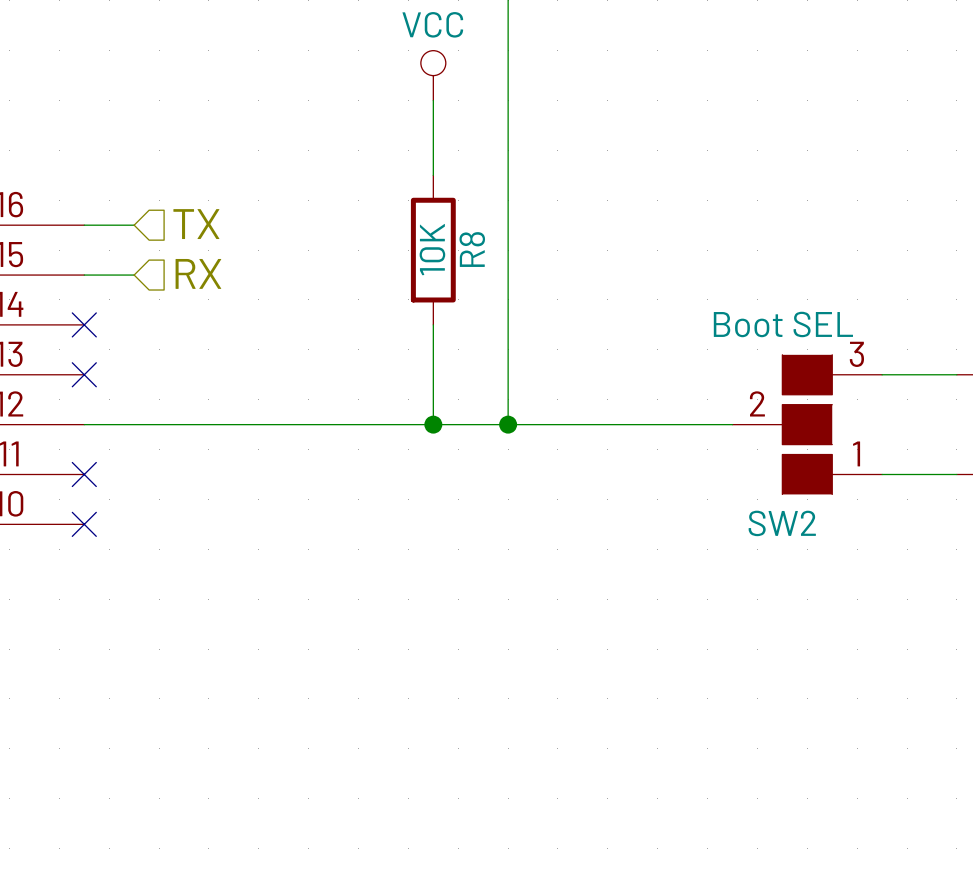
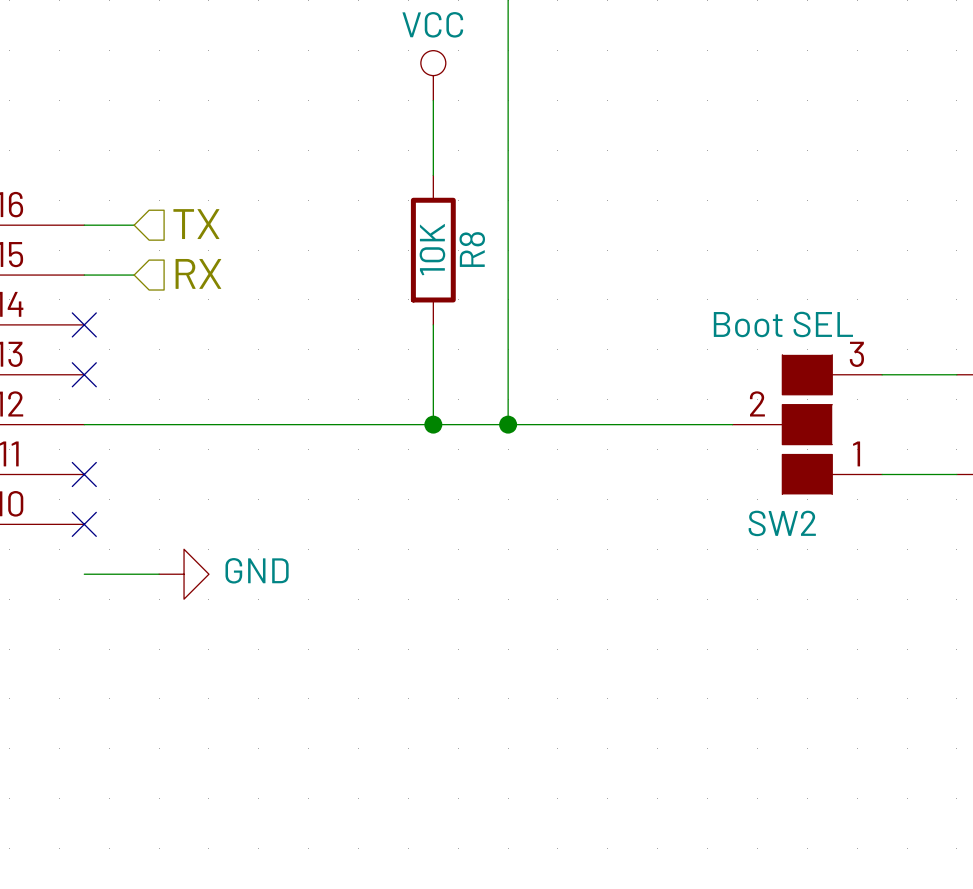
wire: none -> (84, 574) (159, 574)
power symbol: none -> GND (184, 574)

